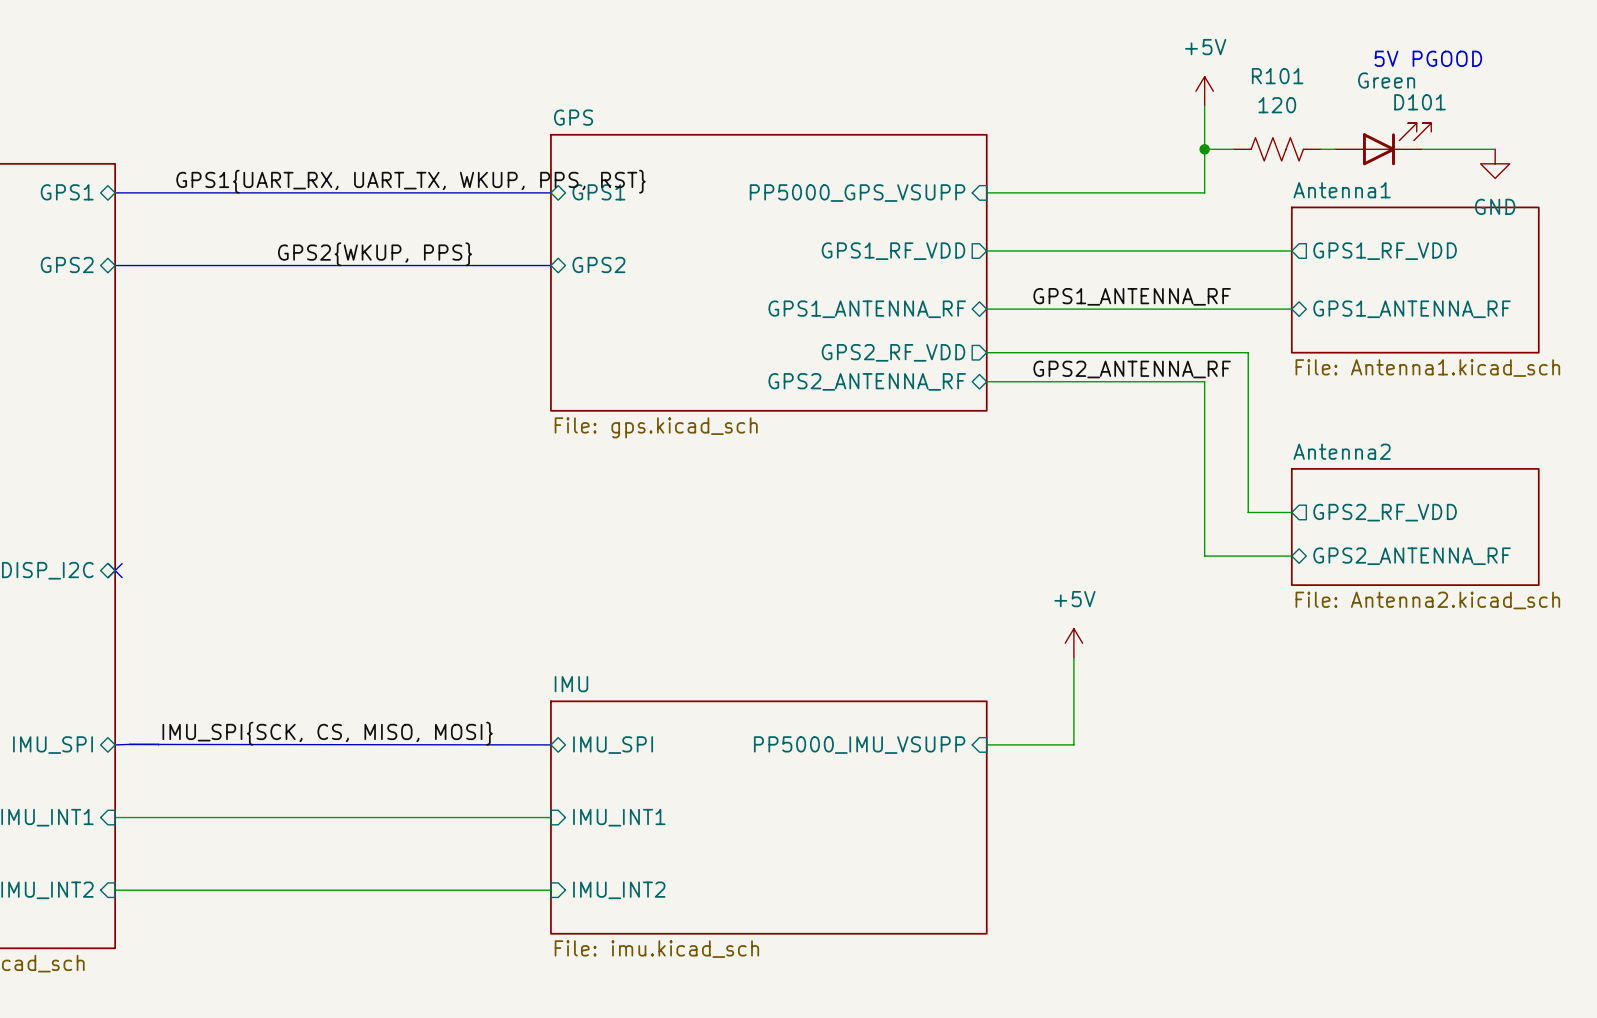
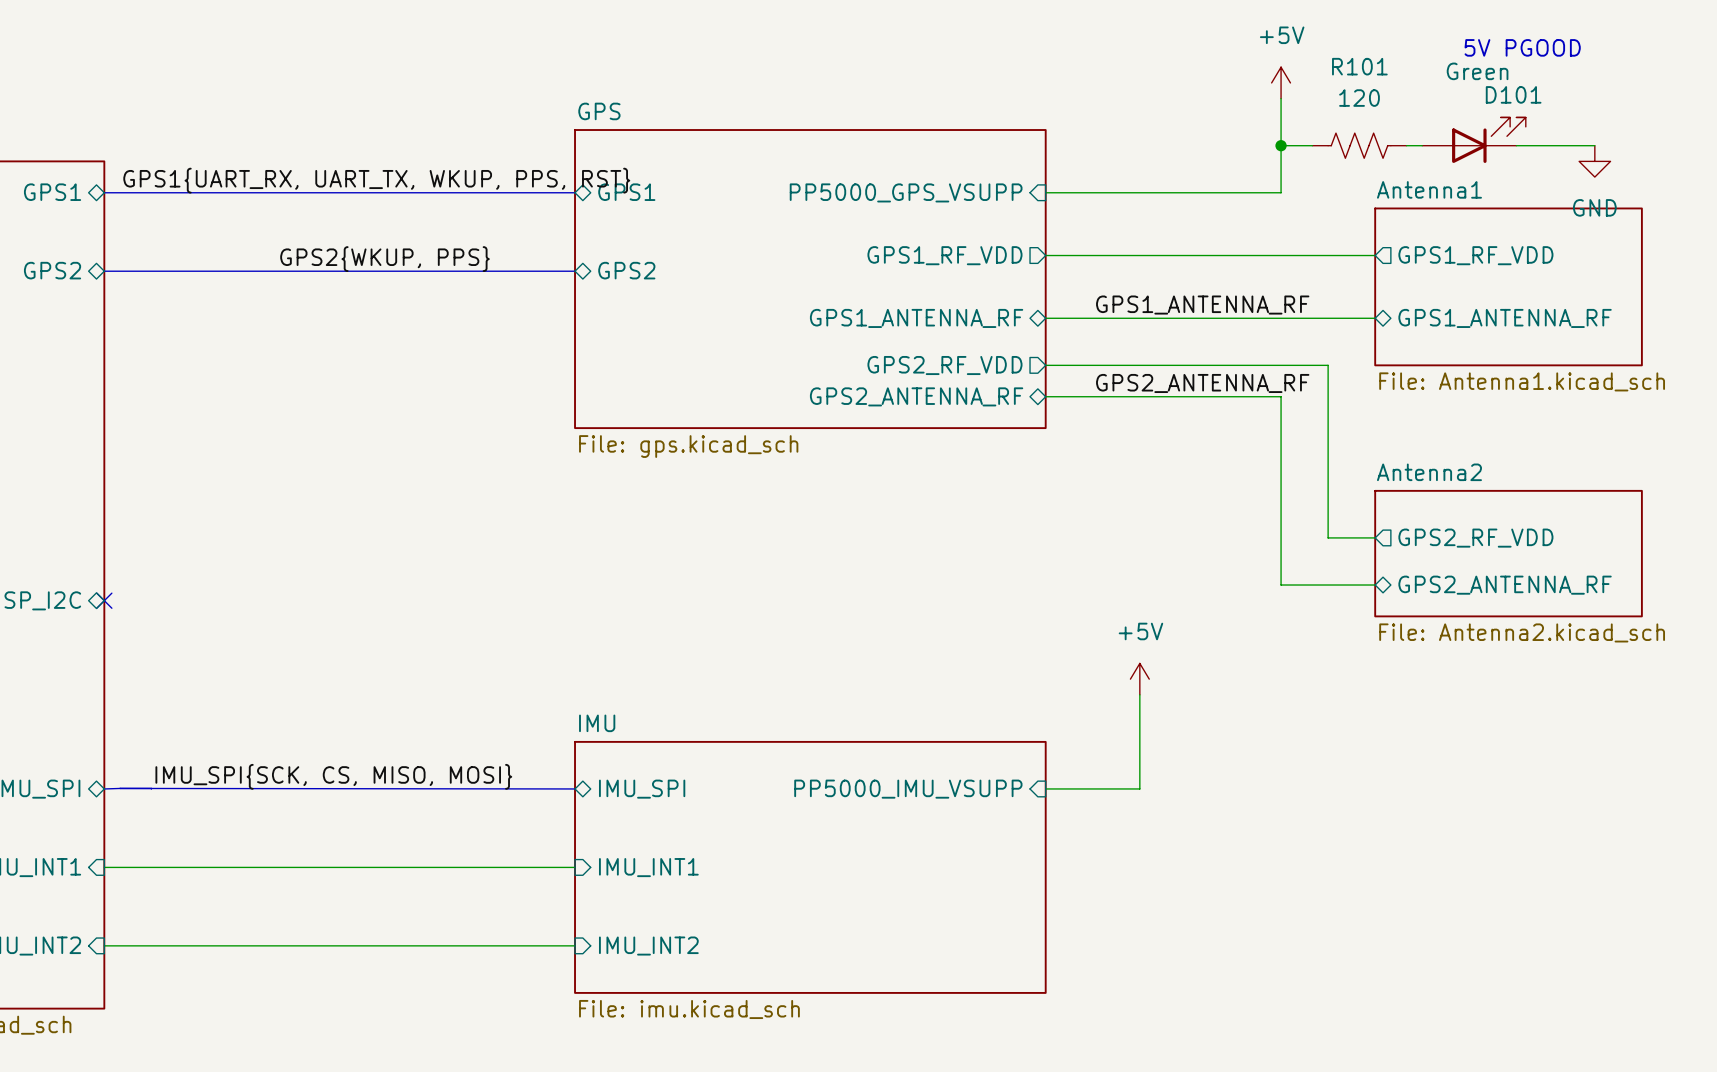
label position: GPS1{UART_RX, UART_TX, WKUP, PPS, RST} (410, 181) -> GPS1{UART_RX, UART_TX, WKUP, PPS, RST} (376, 180)

